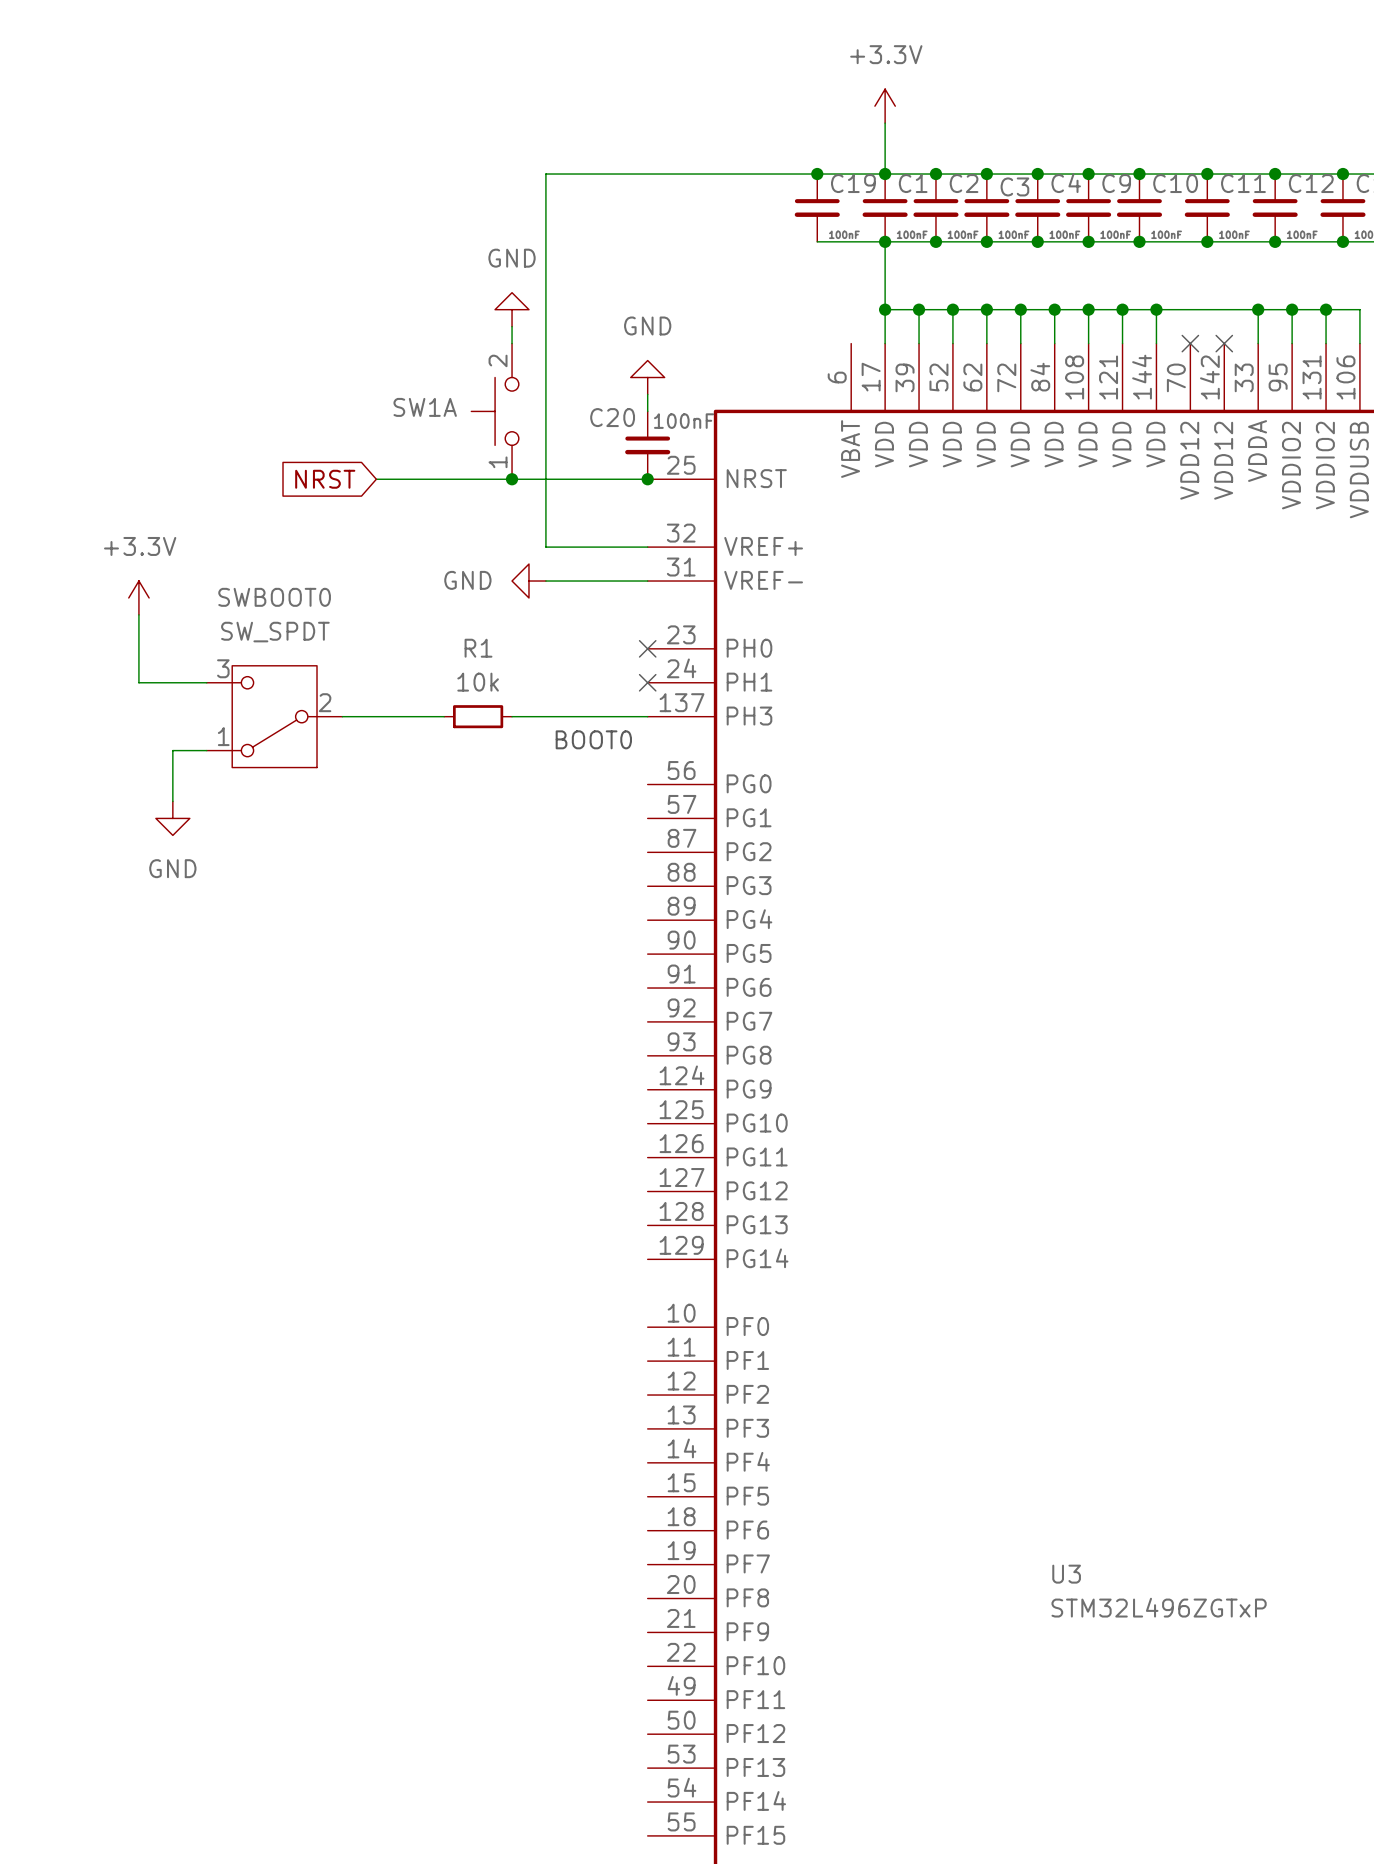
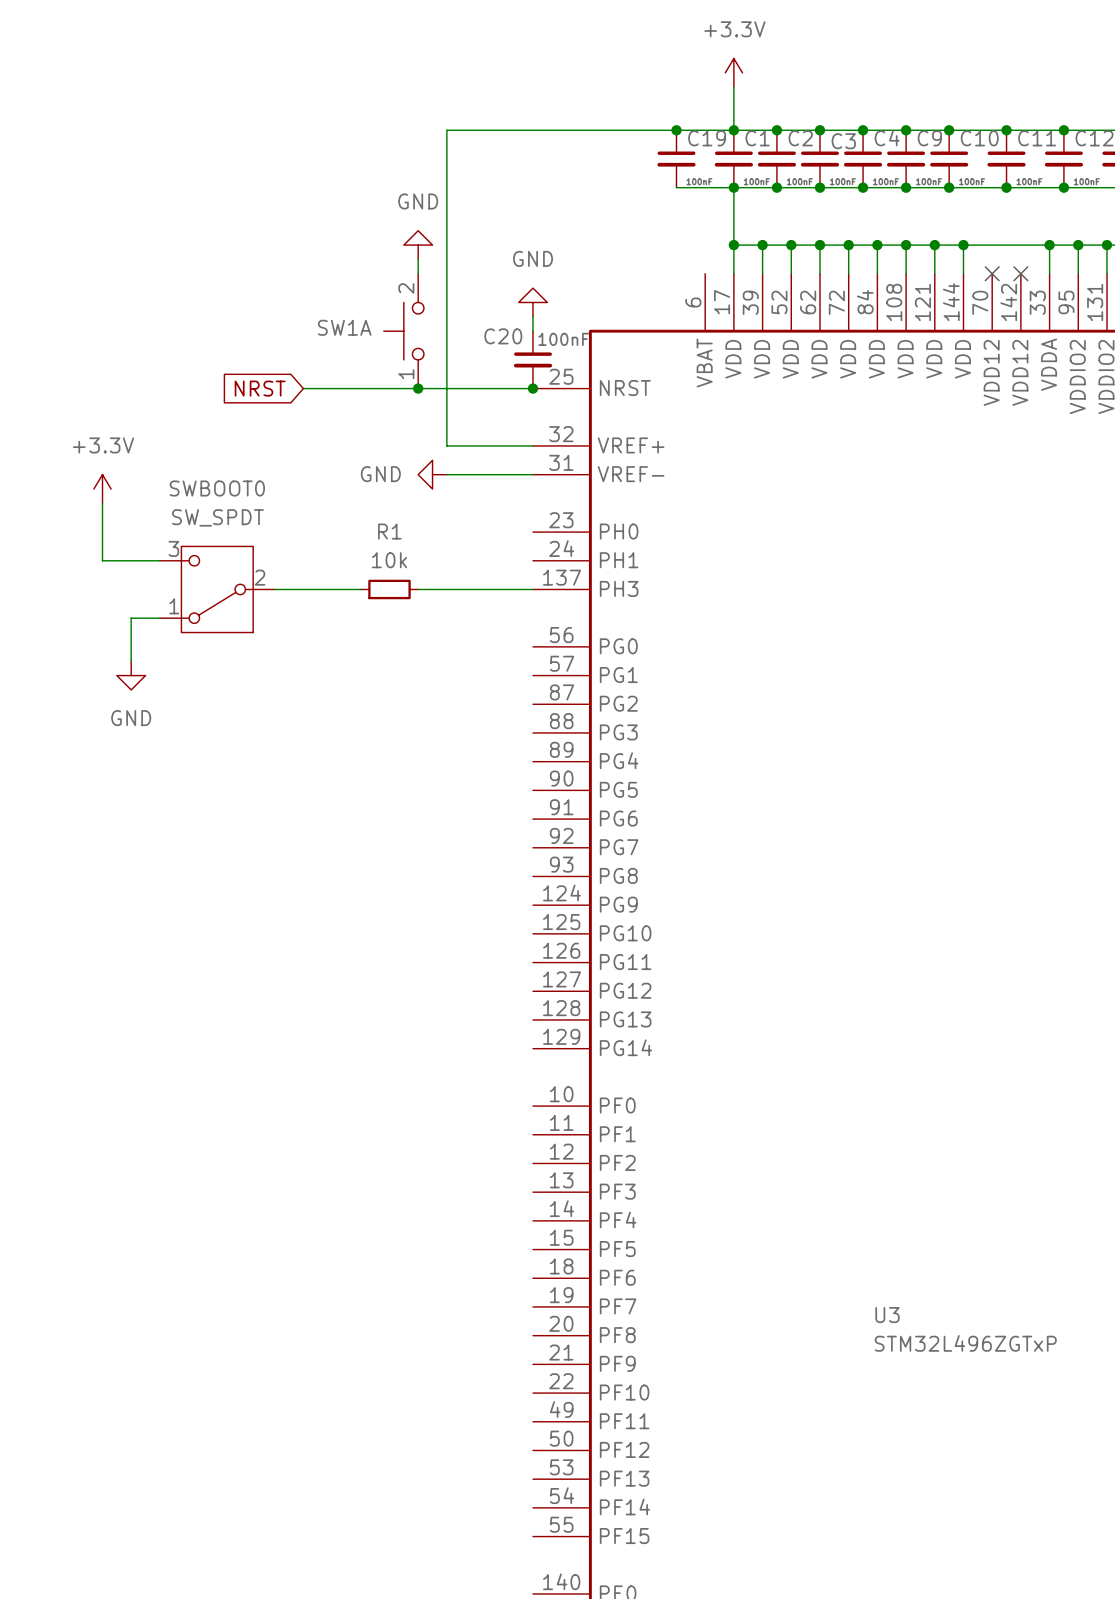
no-connect mark: (647, 648) -> none
no-connect mark: (647, 682) -> none
text: BOOT0 (593, 739) -> none

